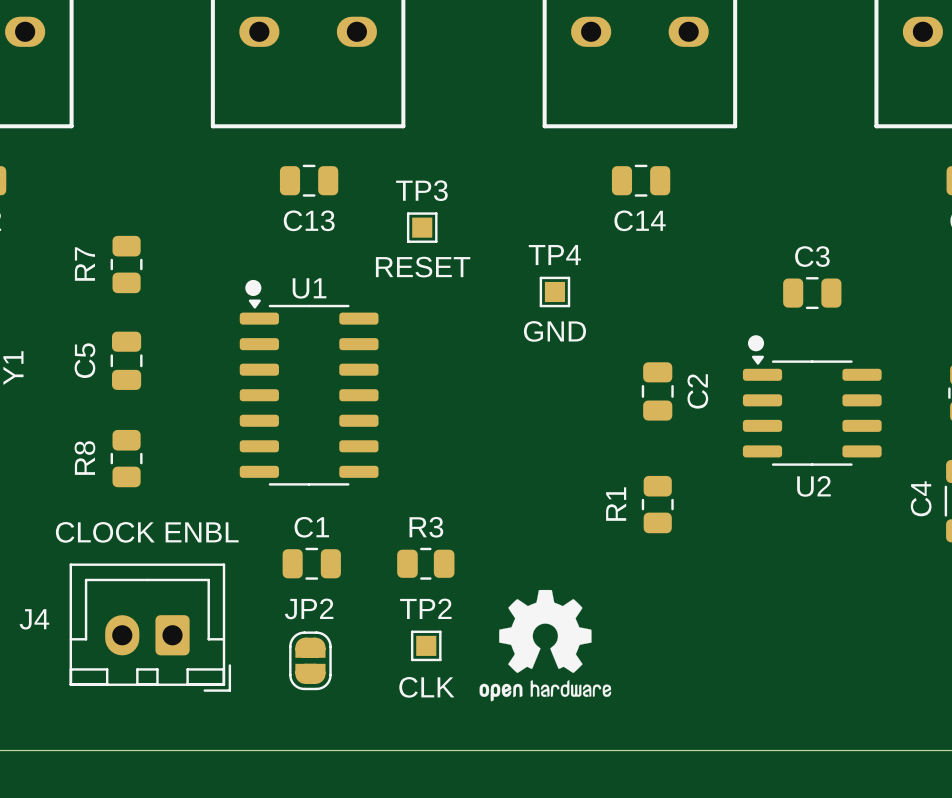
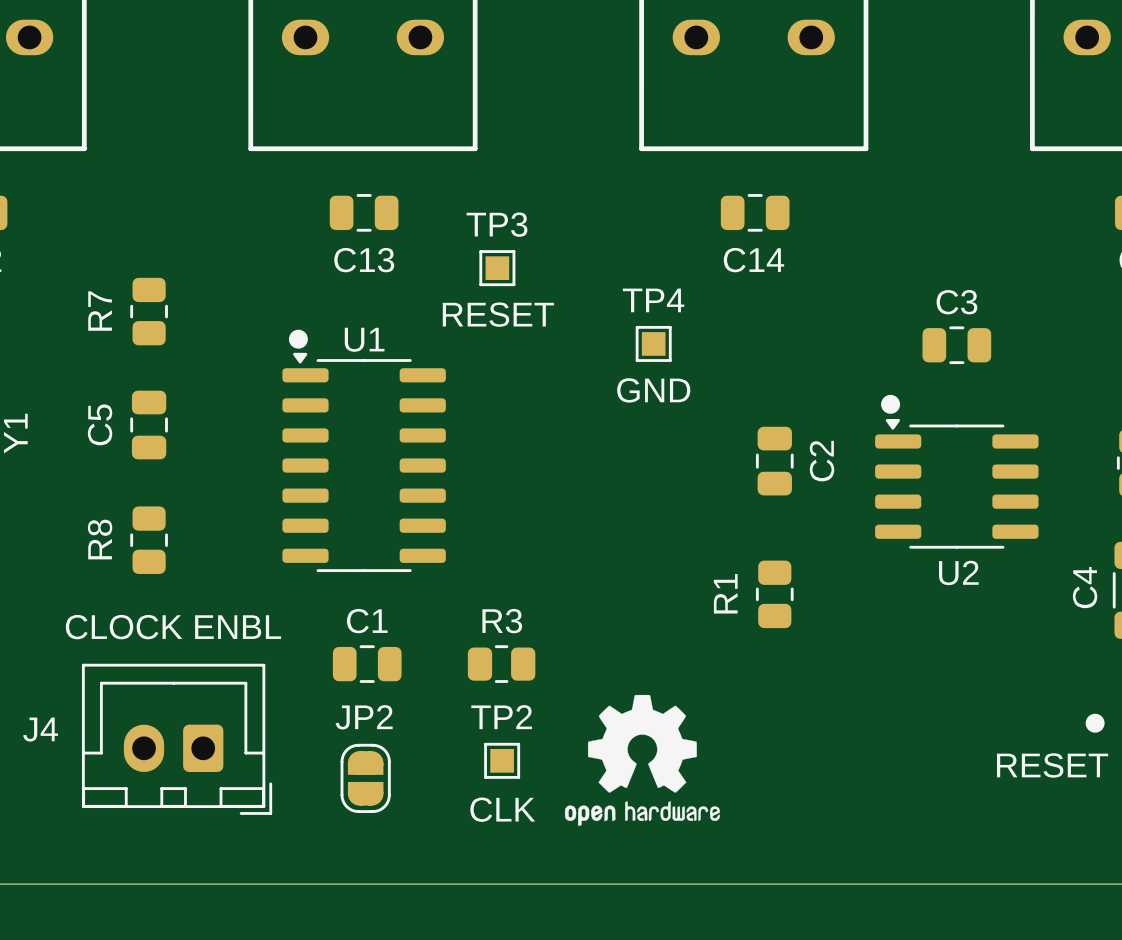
drawing: none -> [1085, 713, 1105, 733]
text: none -> RESET (1052, 765)

